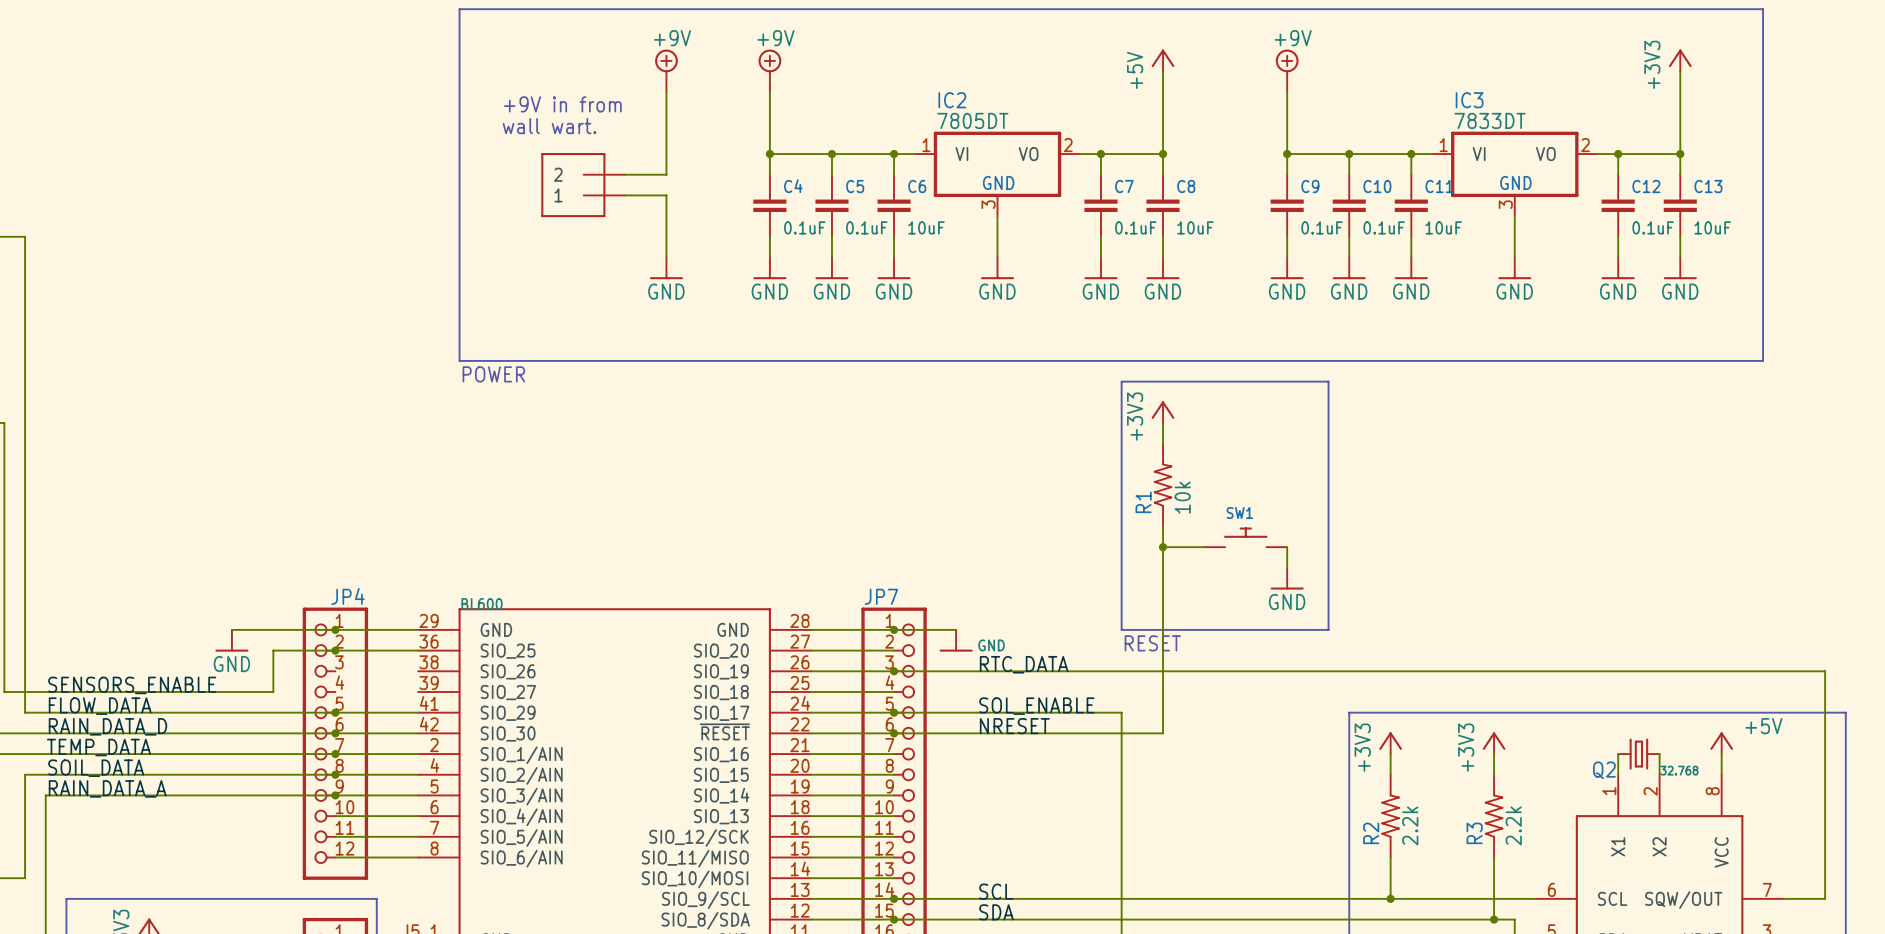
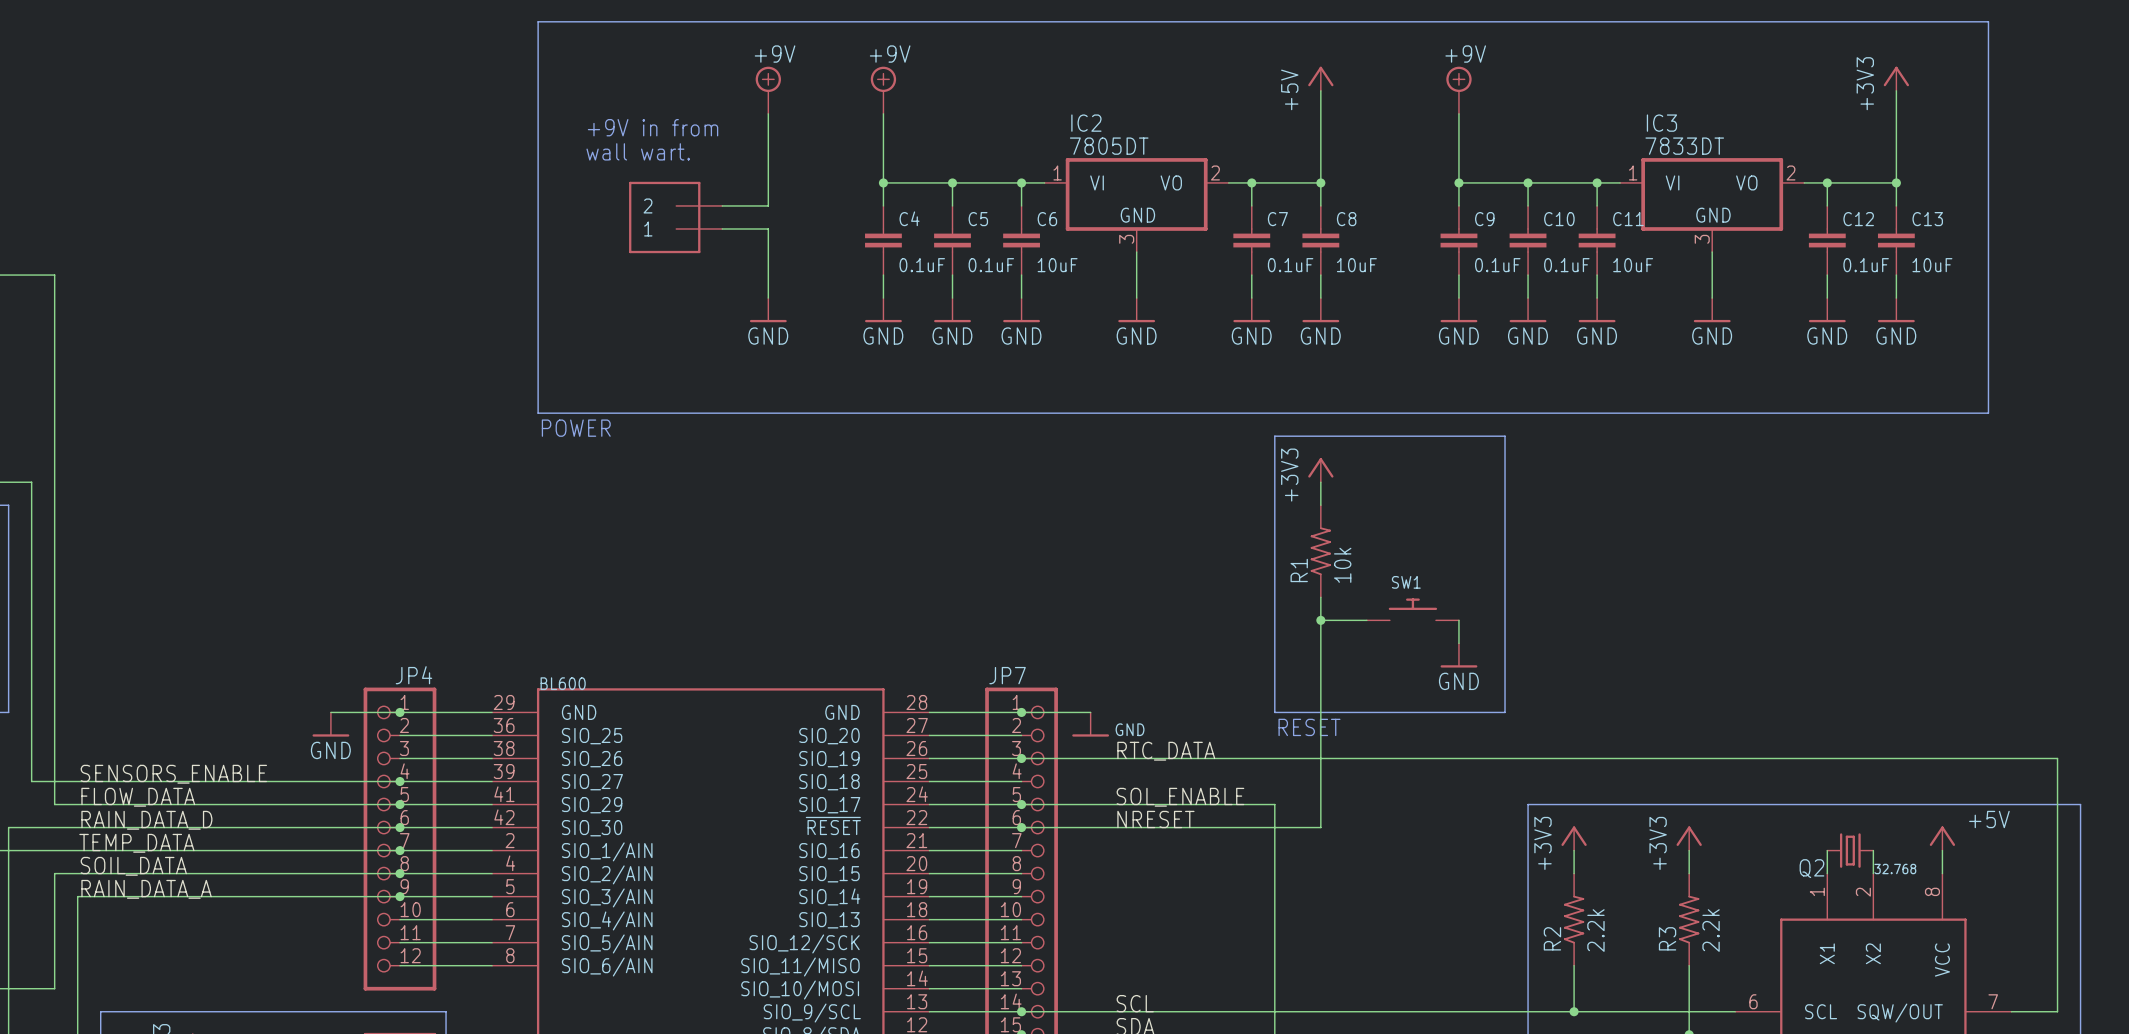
wire: (231, 629) (273, 629) -> none
power symbol position: GND (231, 640) -> GND (330, 724)
wire: (335, 650) (273, 650) (273, 691) -> (492, 781) (330, 781)
junction position: (335, 650) -> (399, 781)
wire: none -> (399, 758) (492, 758)

